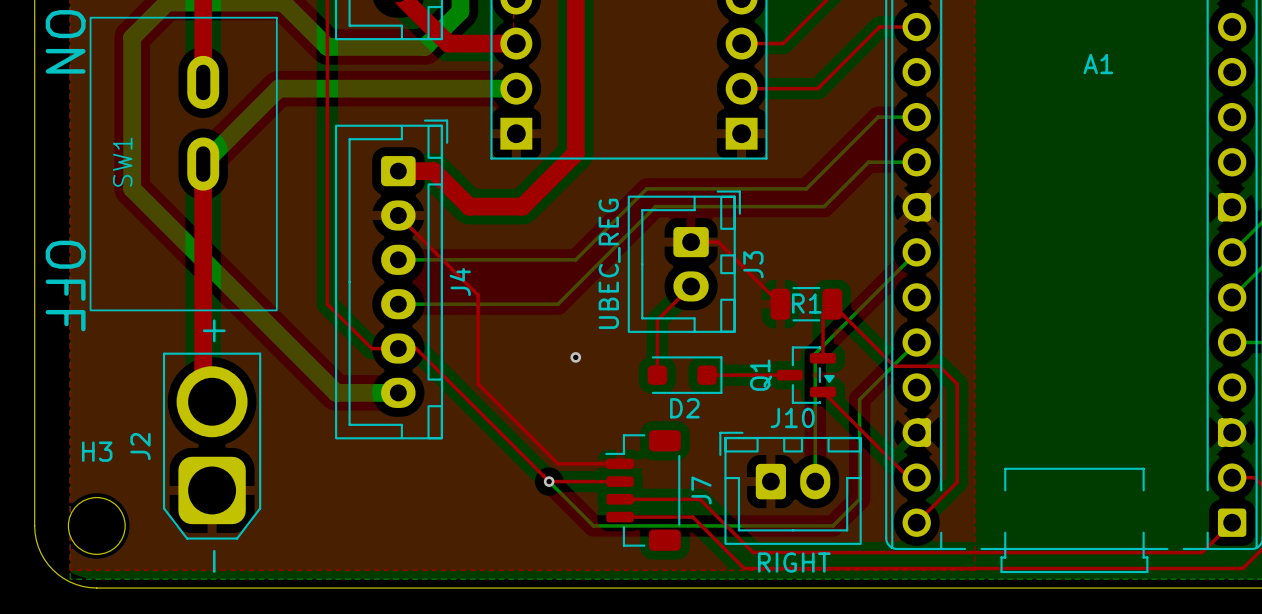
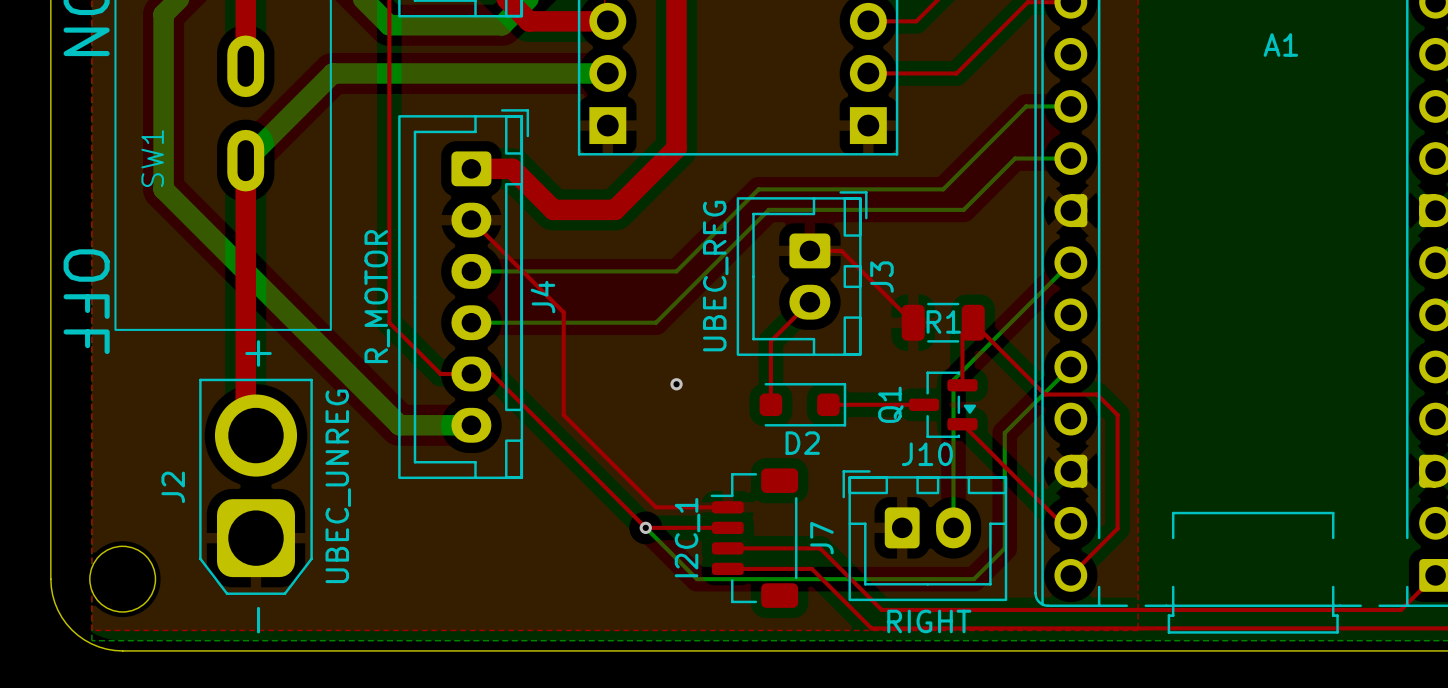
J4 value: none -> R_MOTOR (377, 296)
J2 value: none -> UBEC_UNREG (338, 486)
H3 name: H3 (97, 451) -> none
J7 value: none -> I2C_1 (687, 537)

